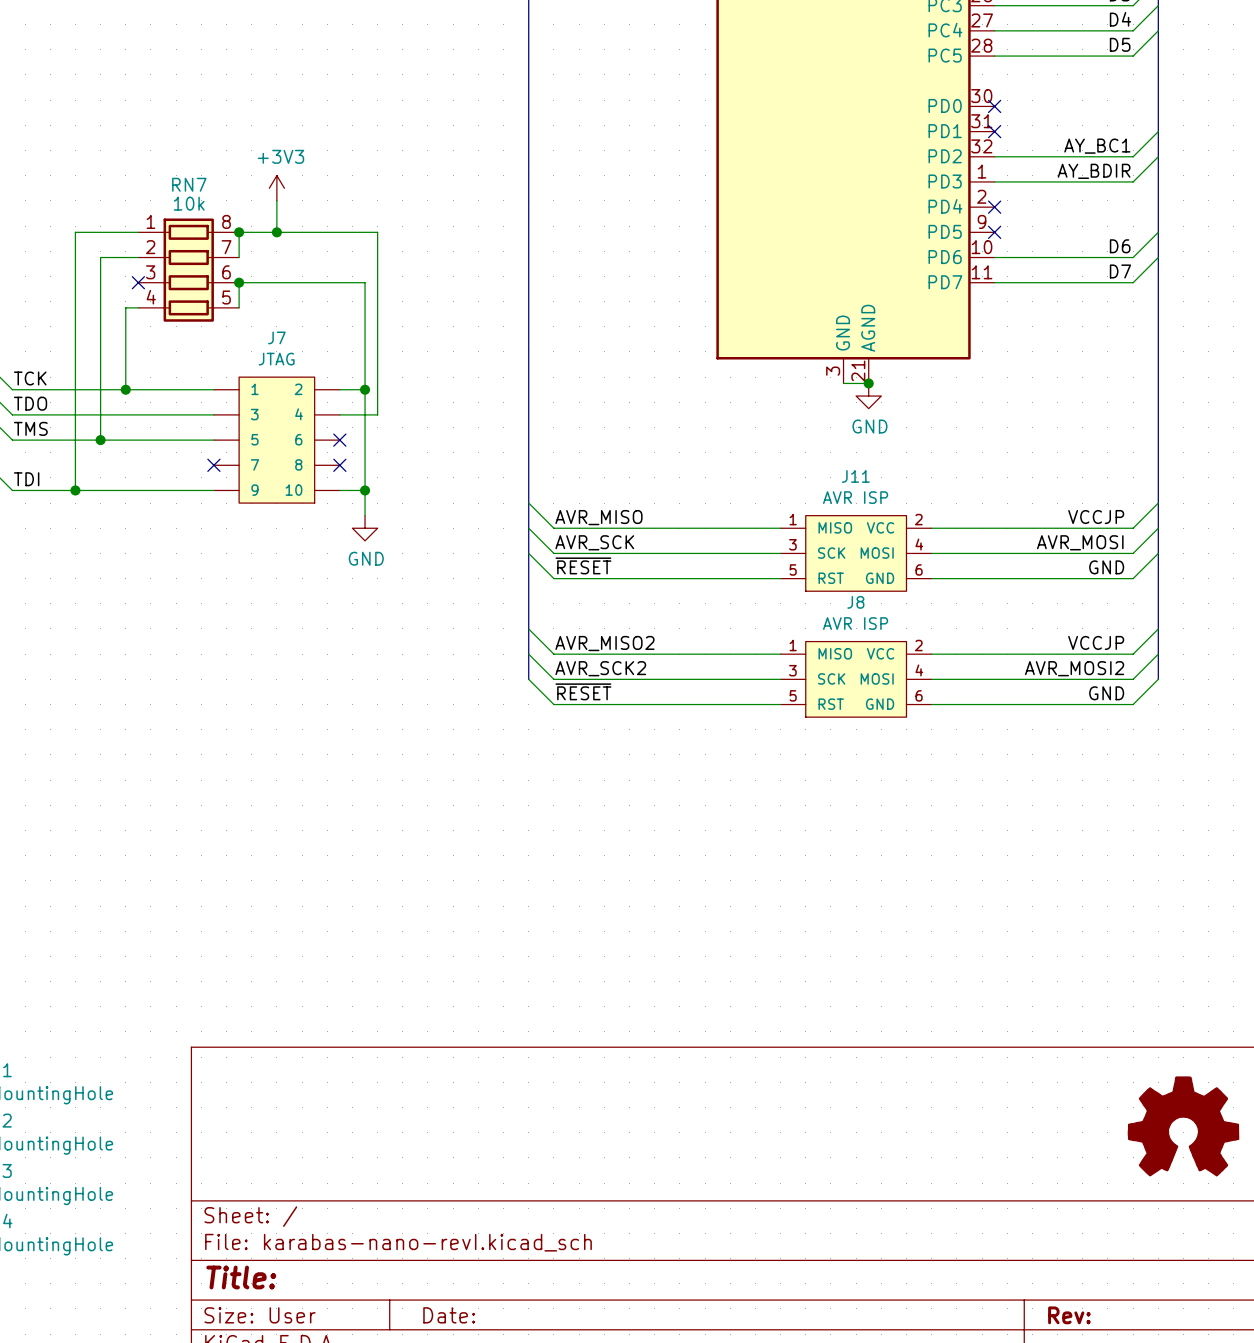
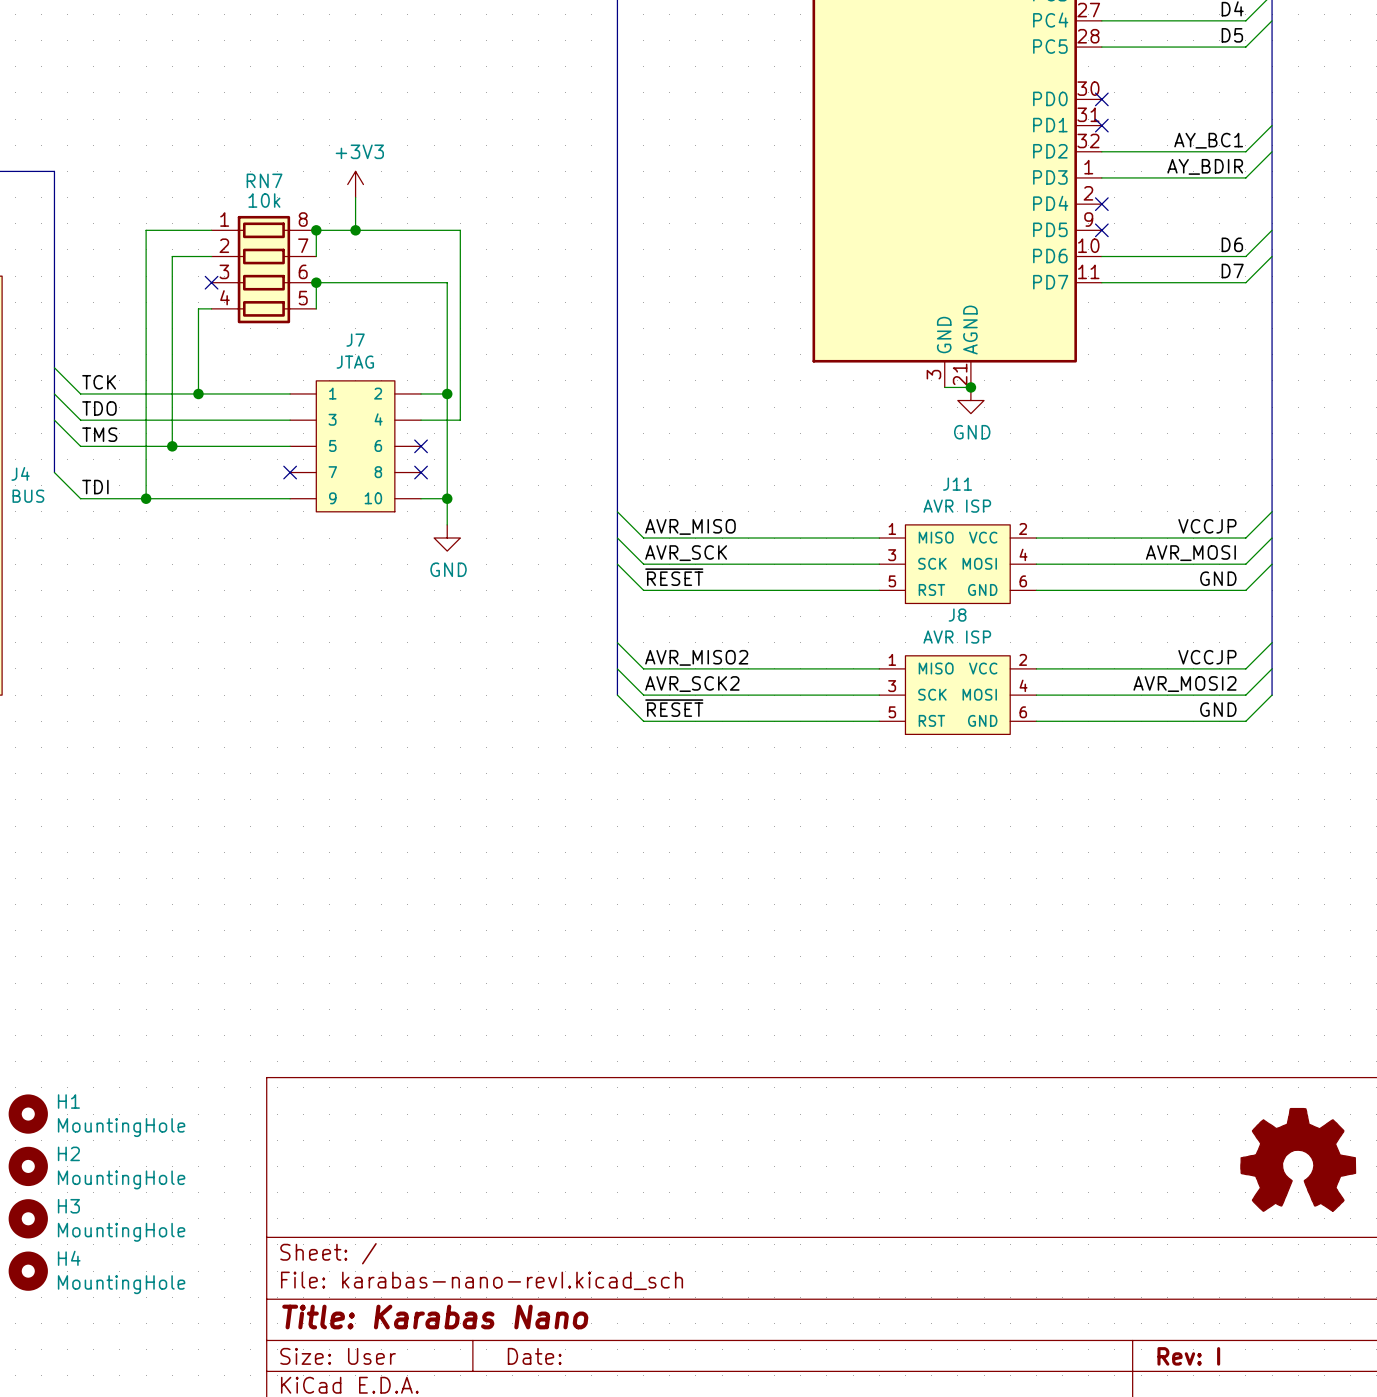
title block: Title: (241, 1277) -> Title: Karabas Nano (435, 1317)
title block: Rev: (1069, 1315) -> Rev: I (1188, 1356)

